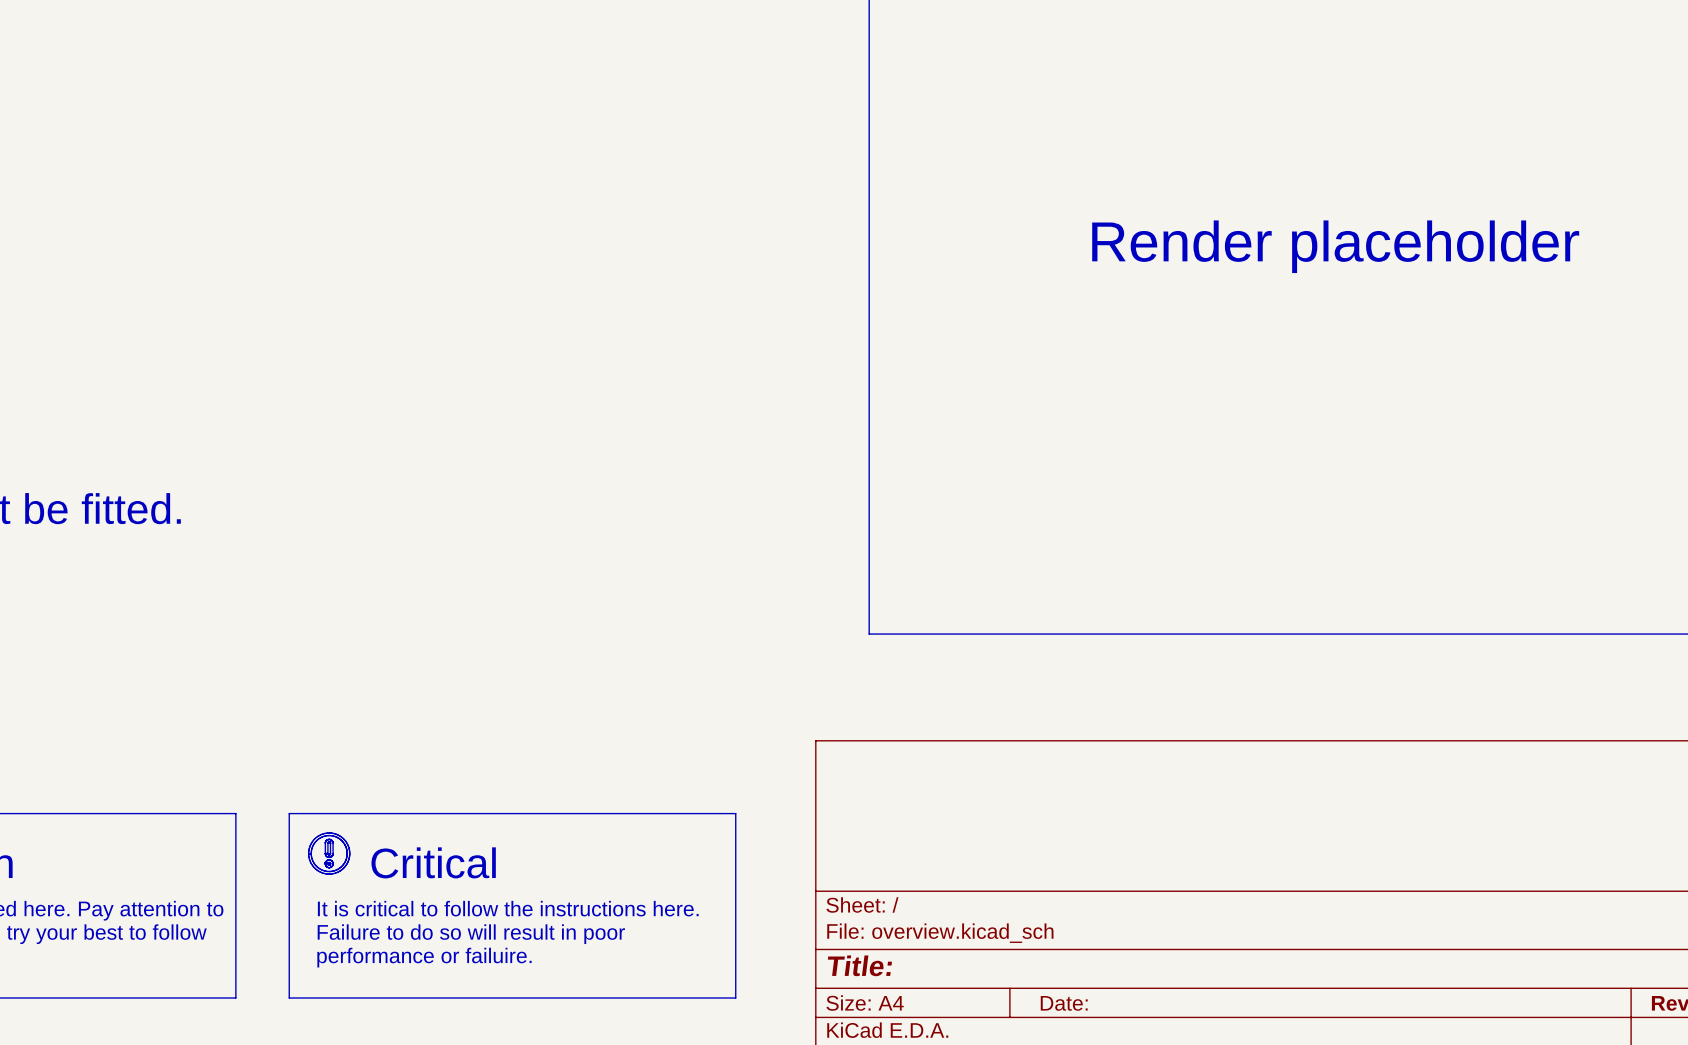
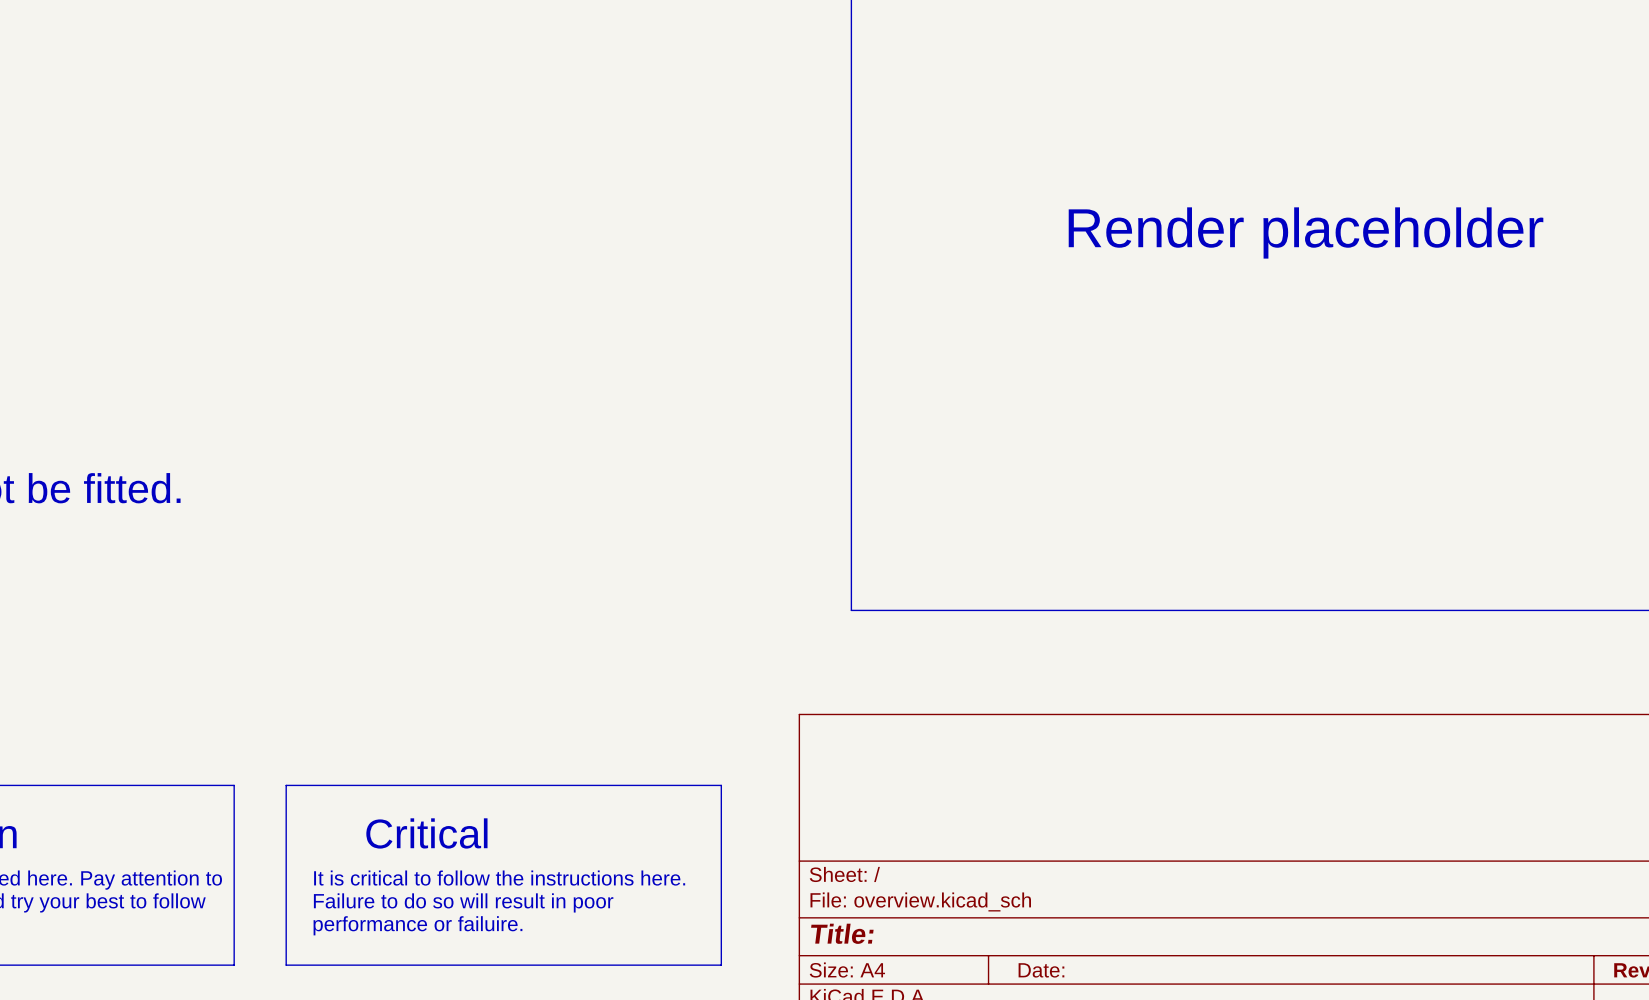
line: (329, 833) (321, 834) (314, 839) (308, 853) (310, 861) (314, 868) (320, 872) (329, 874) (337, 872) (343, 867) (348, 860) (349, 853) (348, 845) (343, 839) (337, 834) (329, 833) -> none
line: (325, 843) (325, 853) -> none
line: (327, 843) (327, 853) (325, 853) -> none
line: (330, 843) (330, 853) -> none
line: (333, 843) (333, 853) -> none
line: (311, 853) (317, 866) (330, 871) (342, 865) (347, 852) (341, 840) (328, 835) (316, 840) (311, 853) -> none
line: (325, 853) (327, 856) (331, 856) -> none
line: (329, 859) (325, 862) -> none
line: (332, 862) (329, 867) (325, 863) -> none

